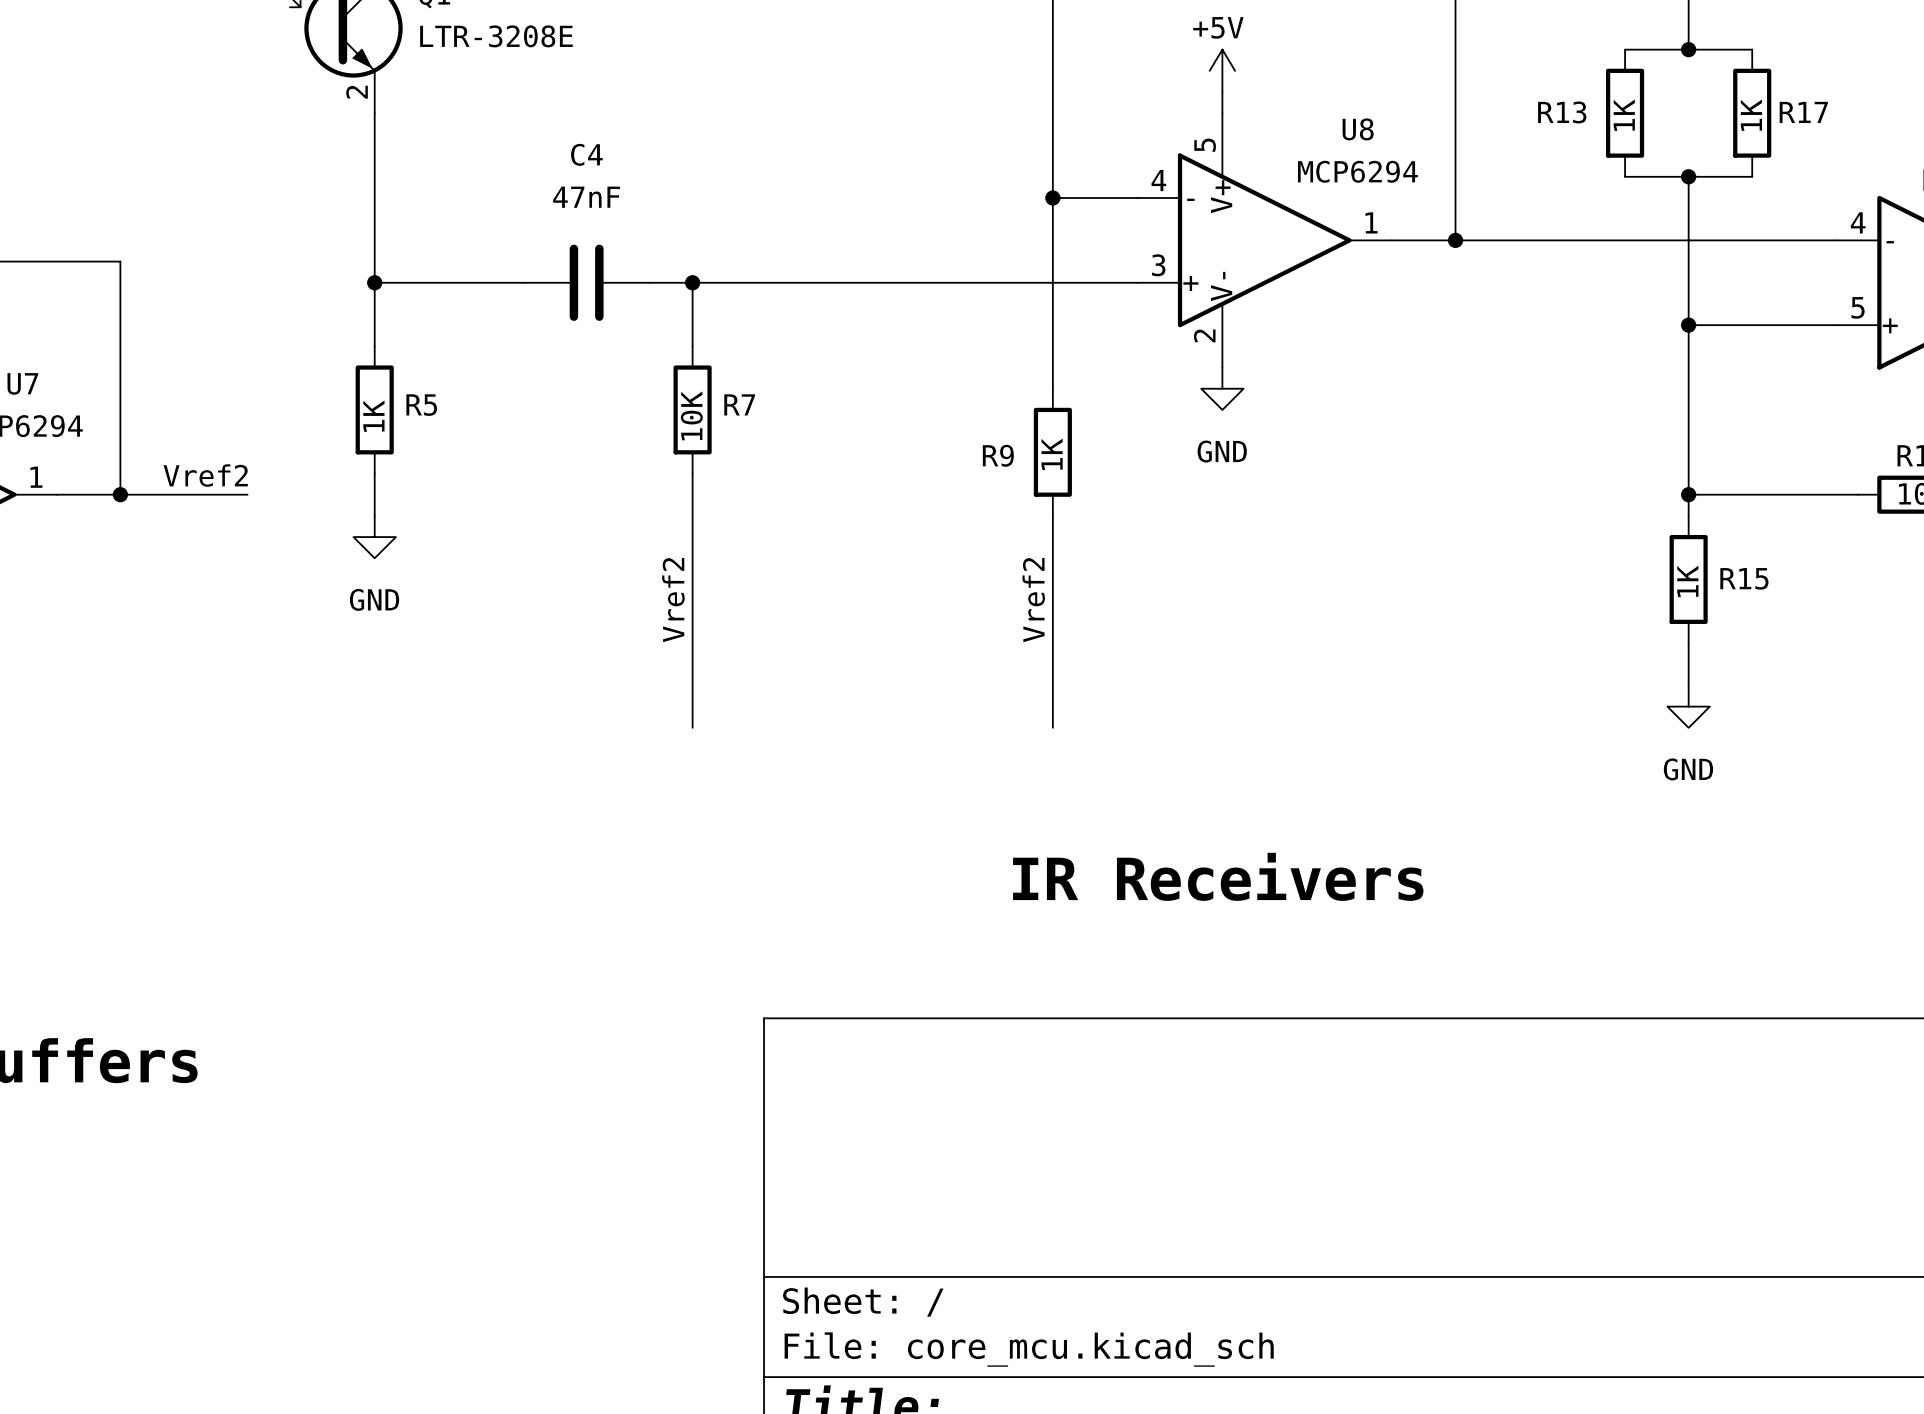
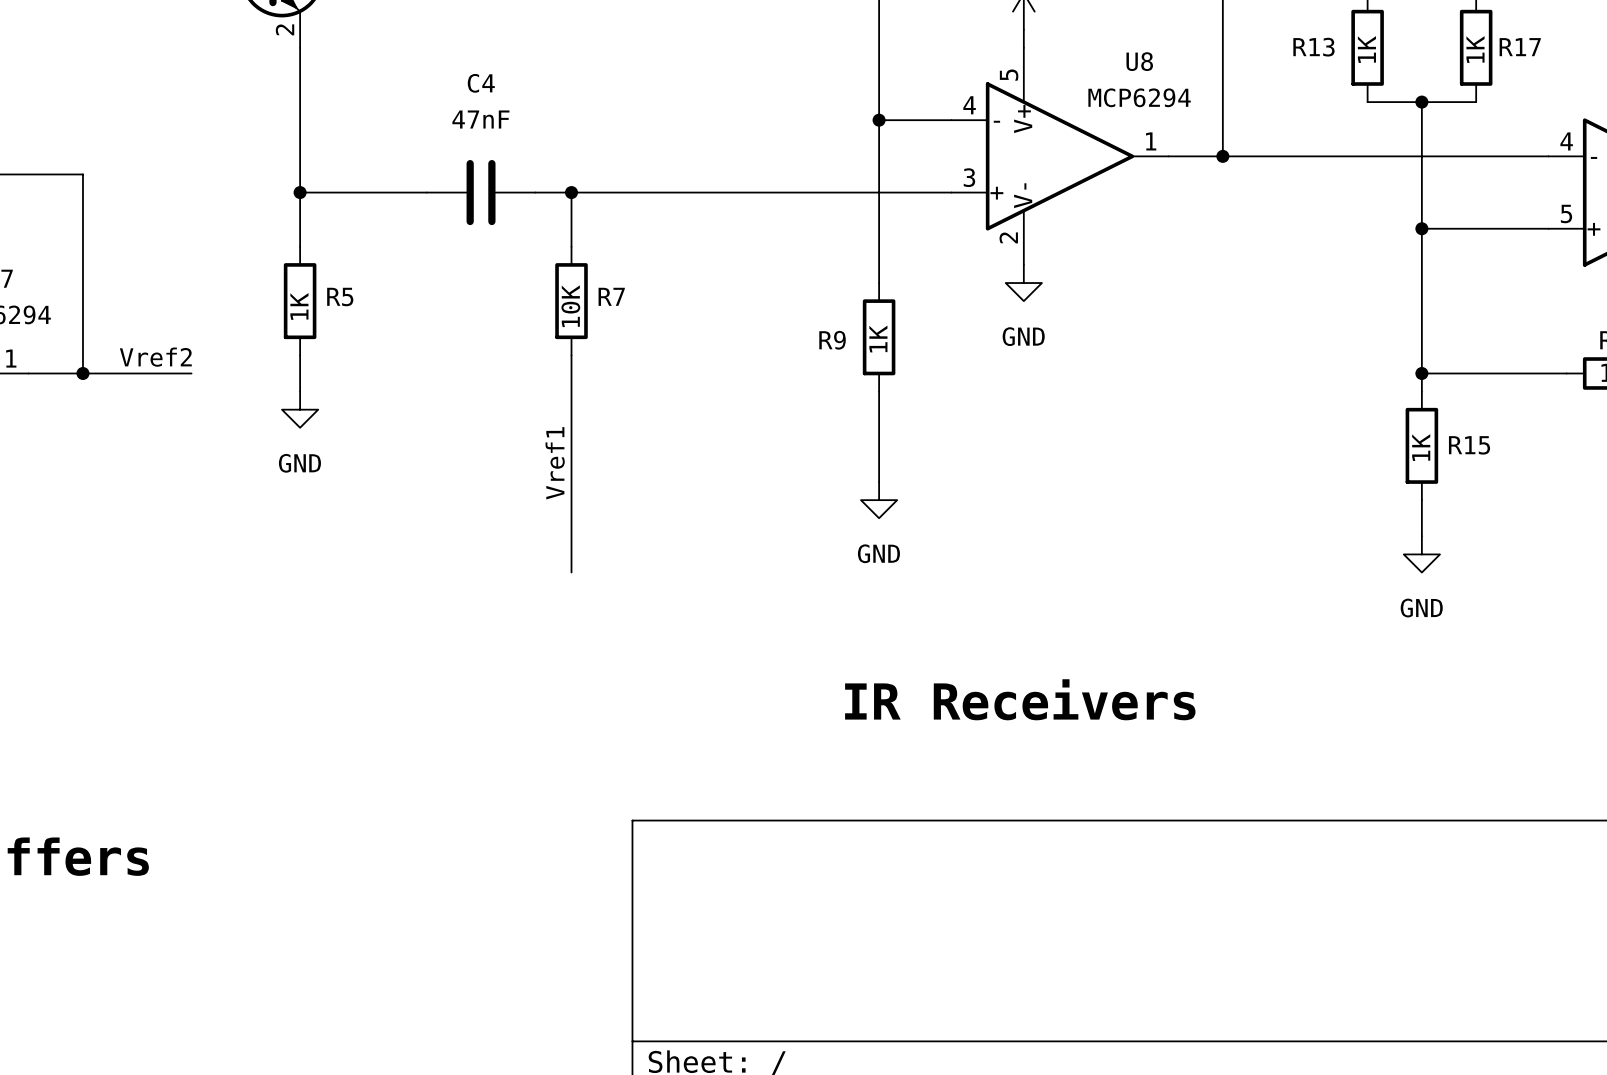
label: Vref2 (673, 600) -> Vref1 (555, 463)
label: Vref2 (1033, 600) -> none
wire: (1052, 621) (1052, 727) -> none
power symbol: none -> GND (879, 500)

